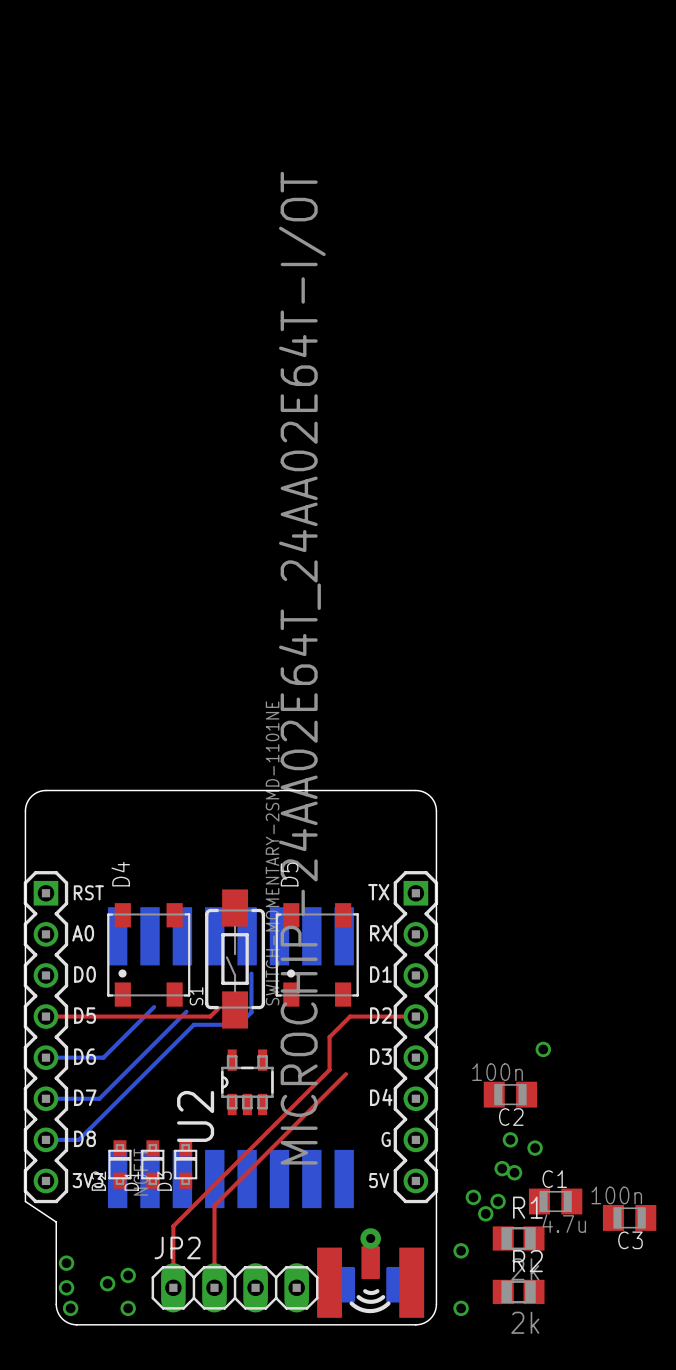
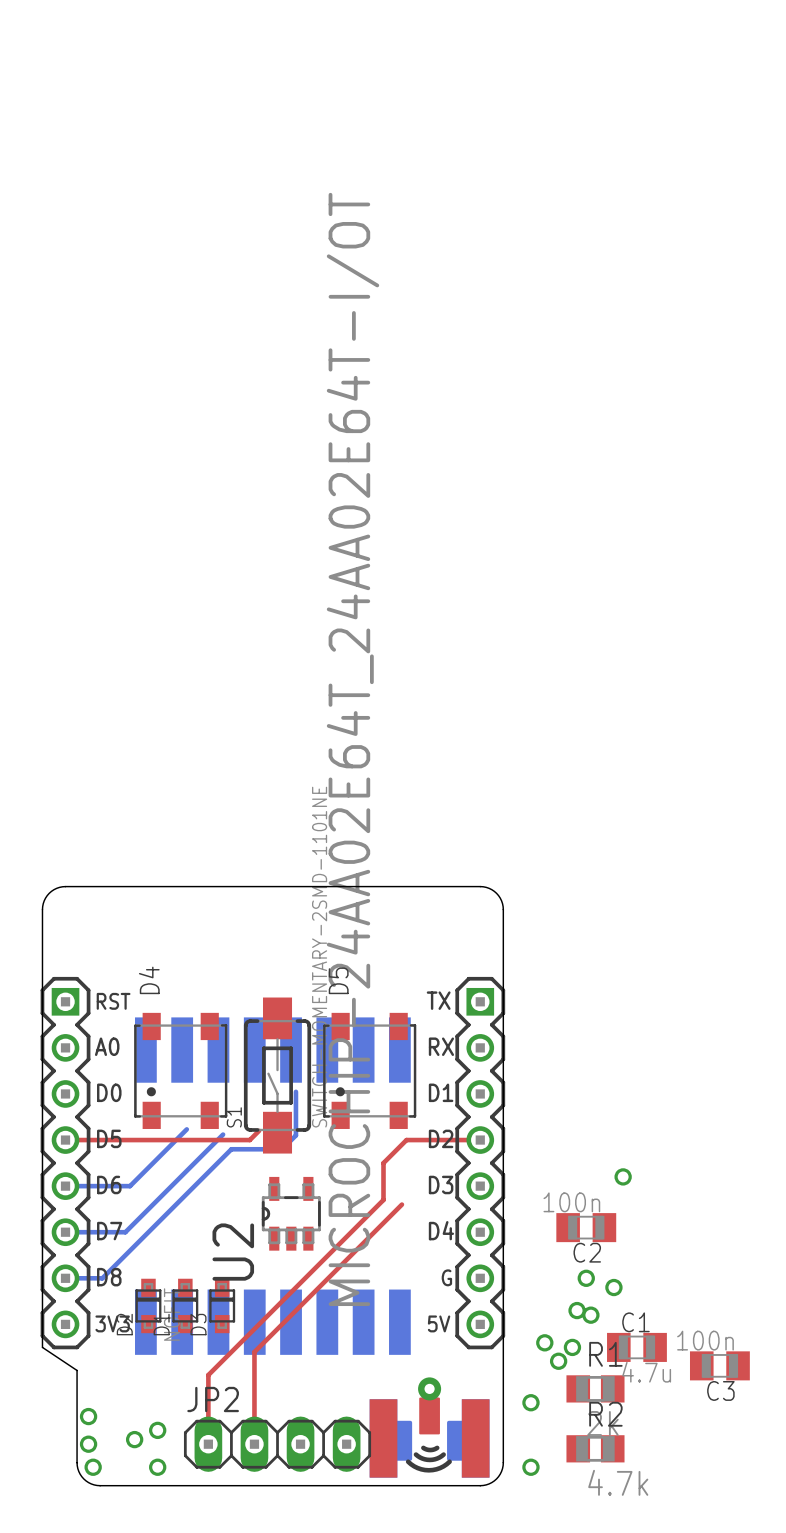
R2 value: 2k (525, 1322) -> 4.7k (618, 1482)

